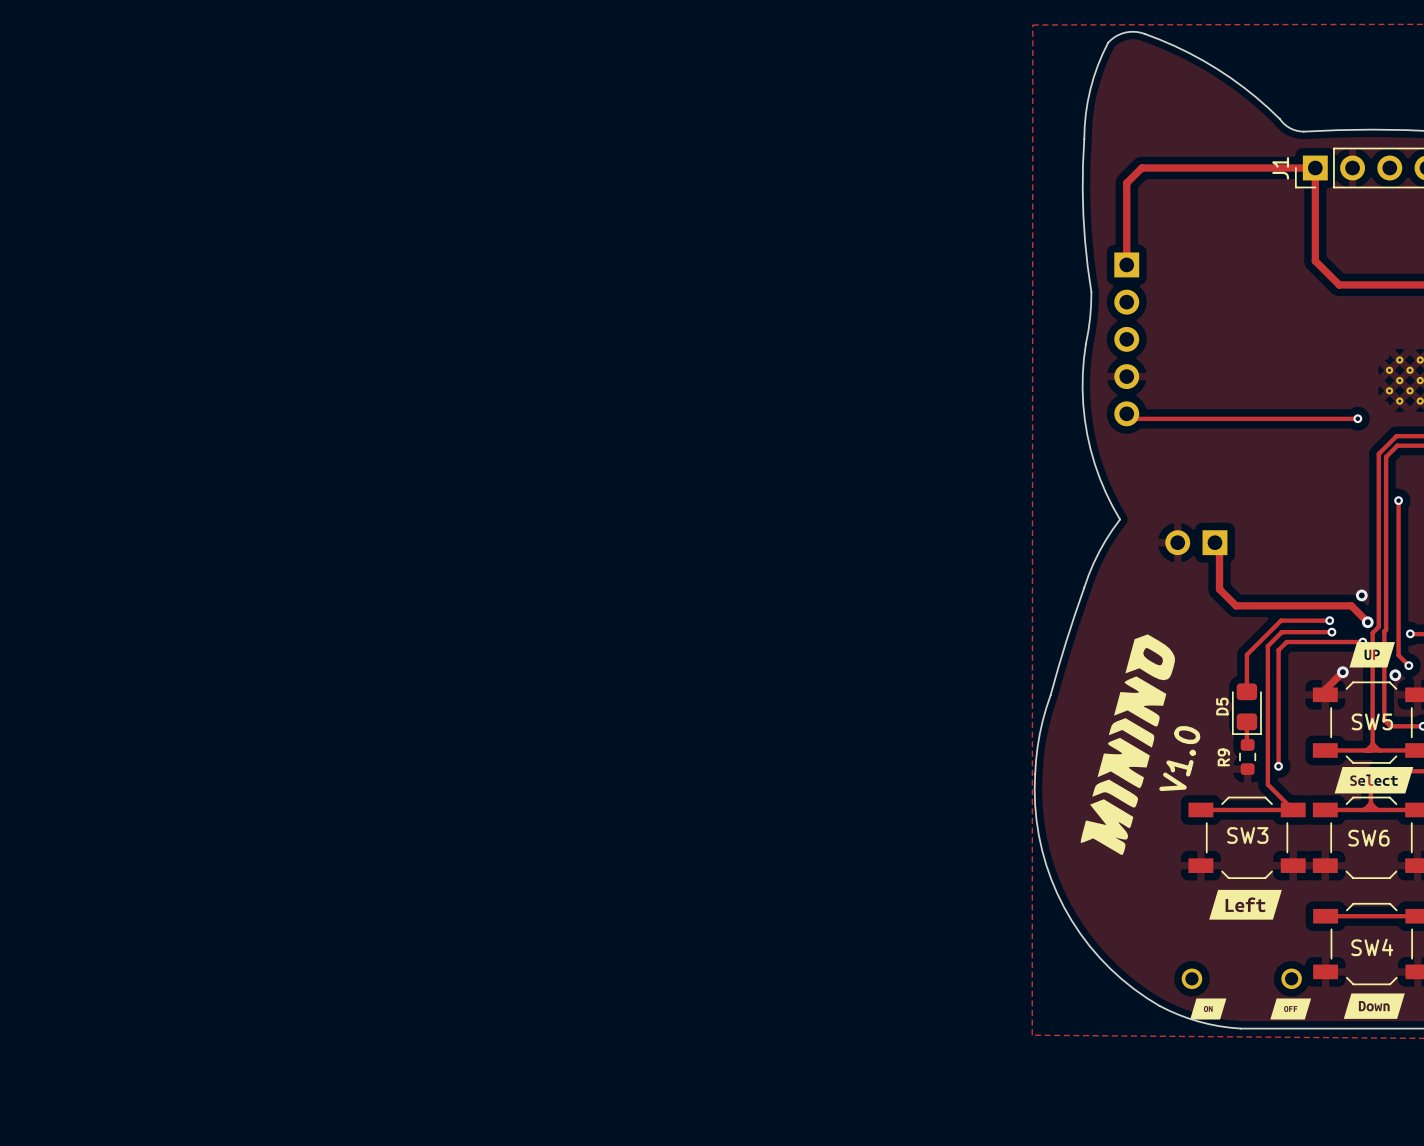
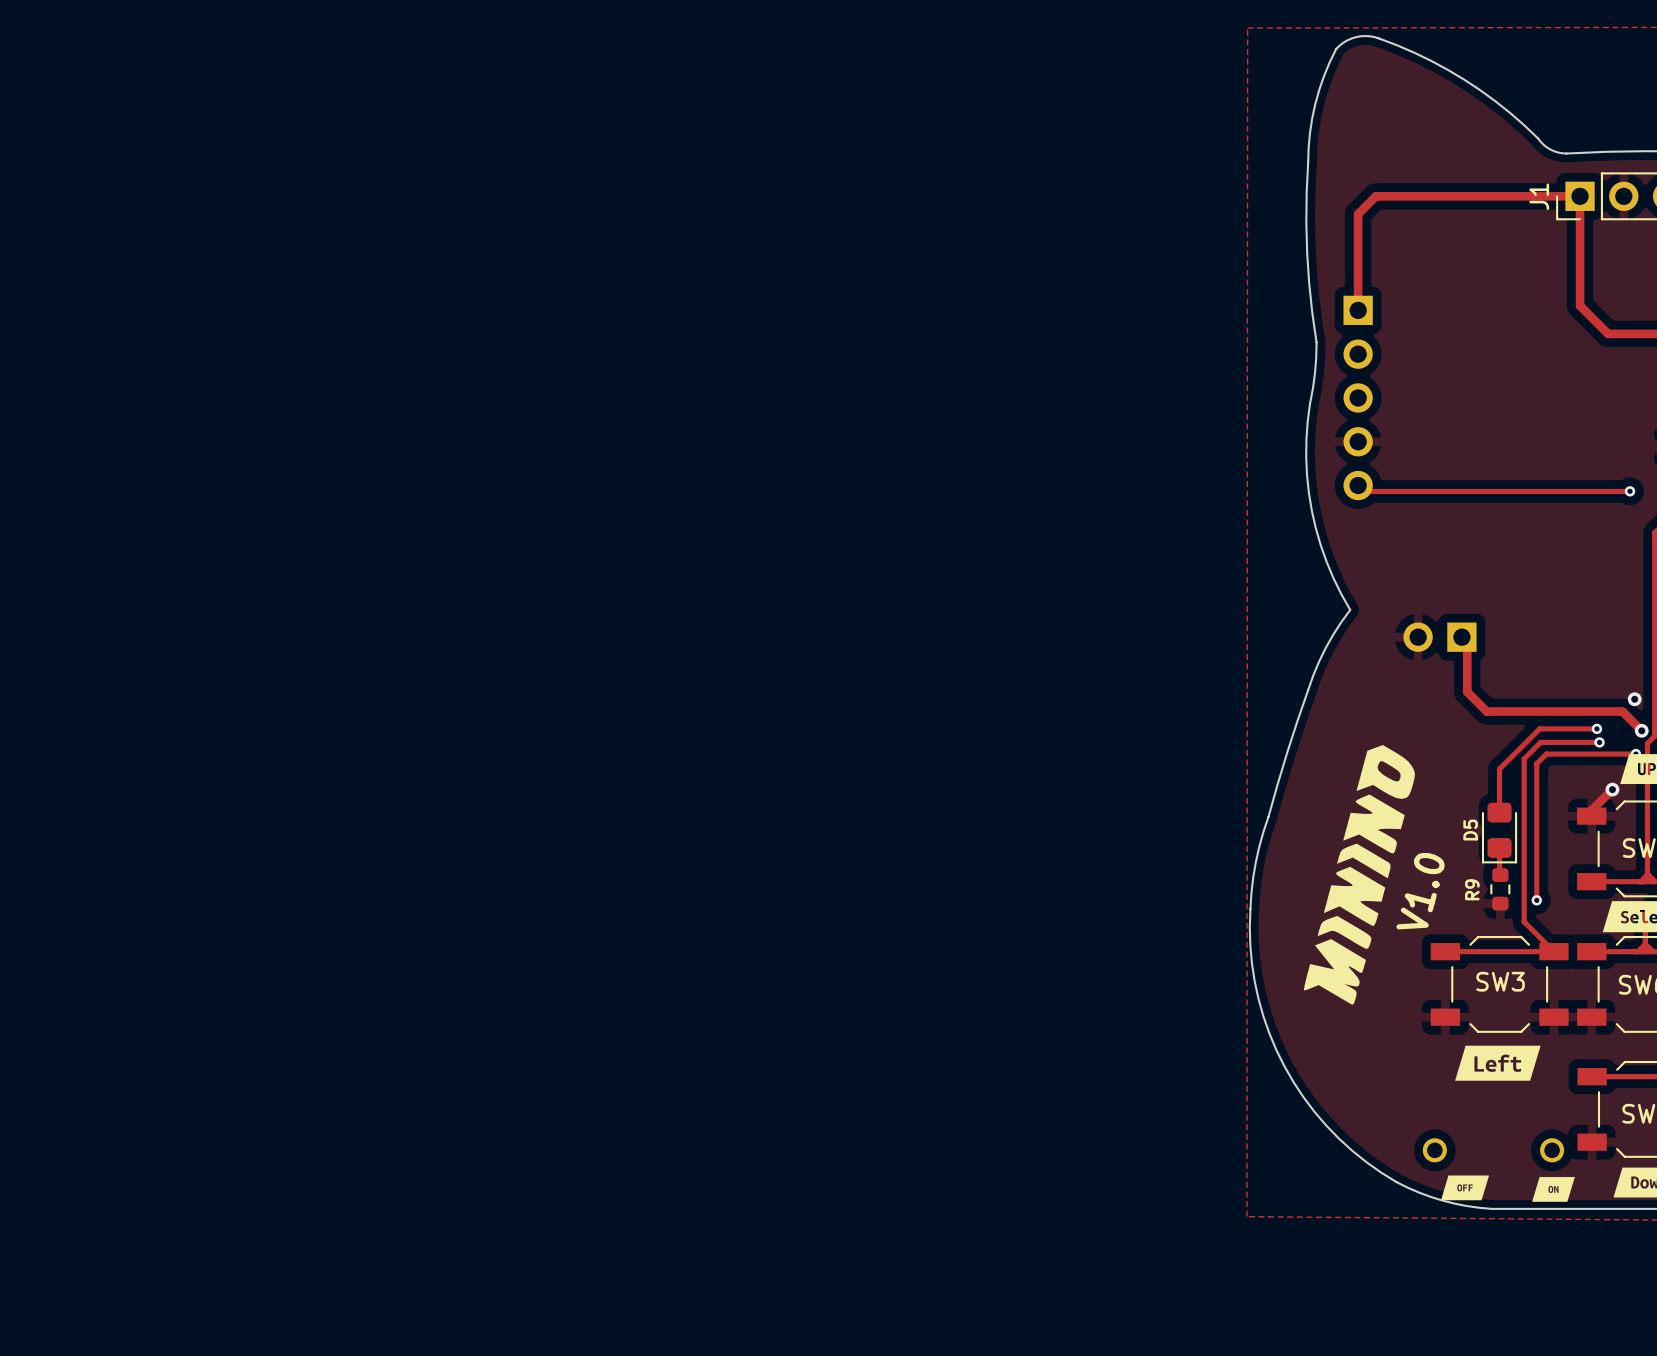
drawing position: (1208, 1009) -> (1553, 1189)
drawing position: (1290, 1009) -> (1465, 1187)

